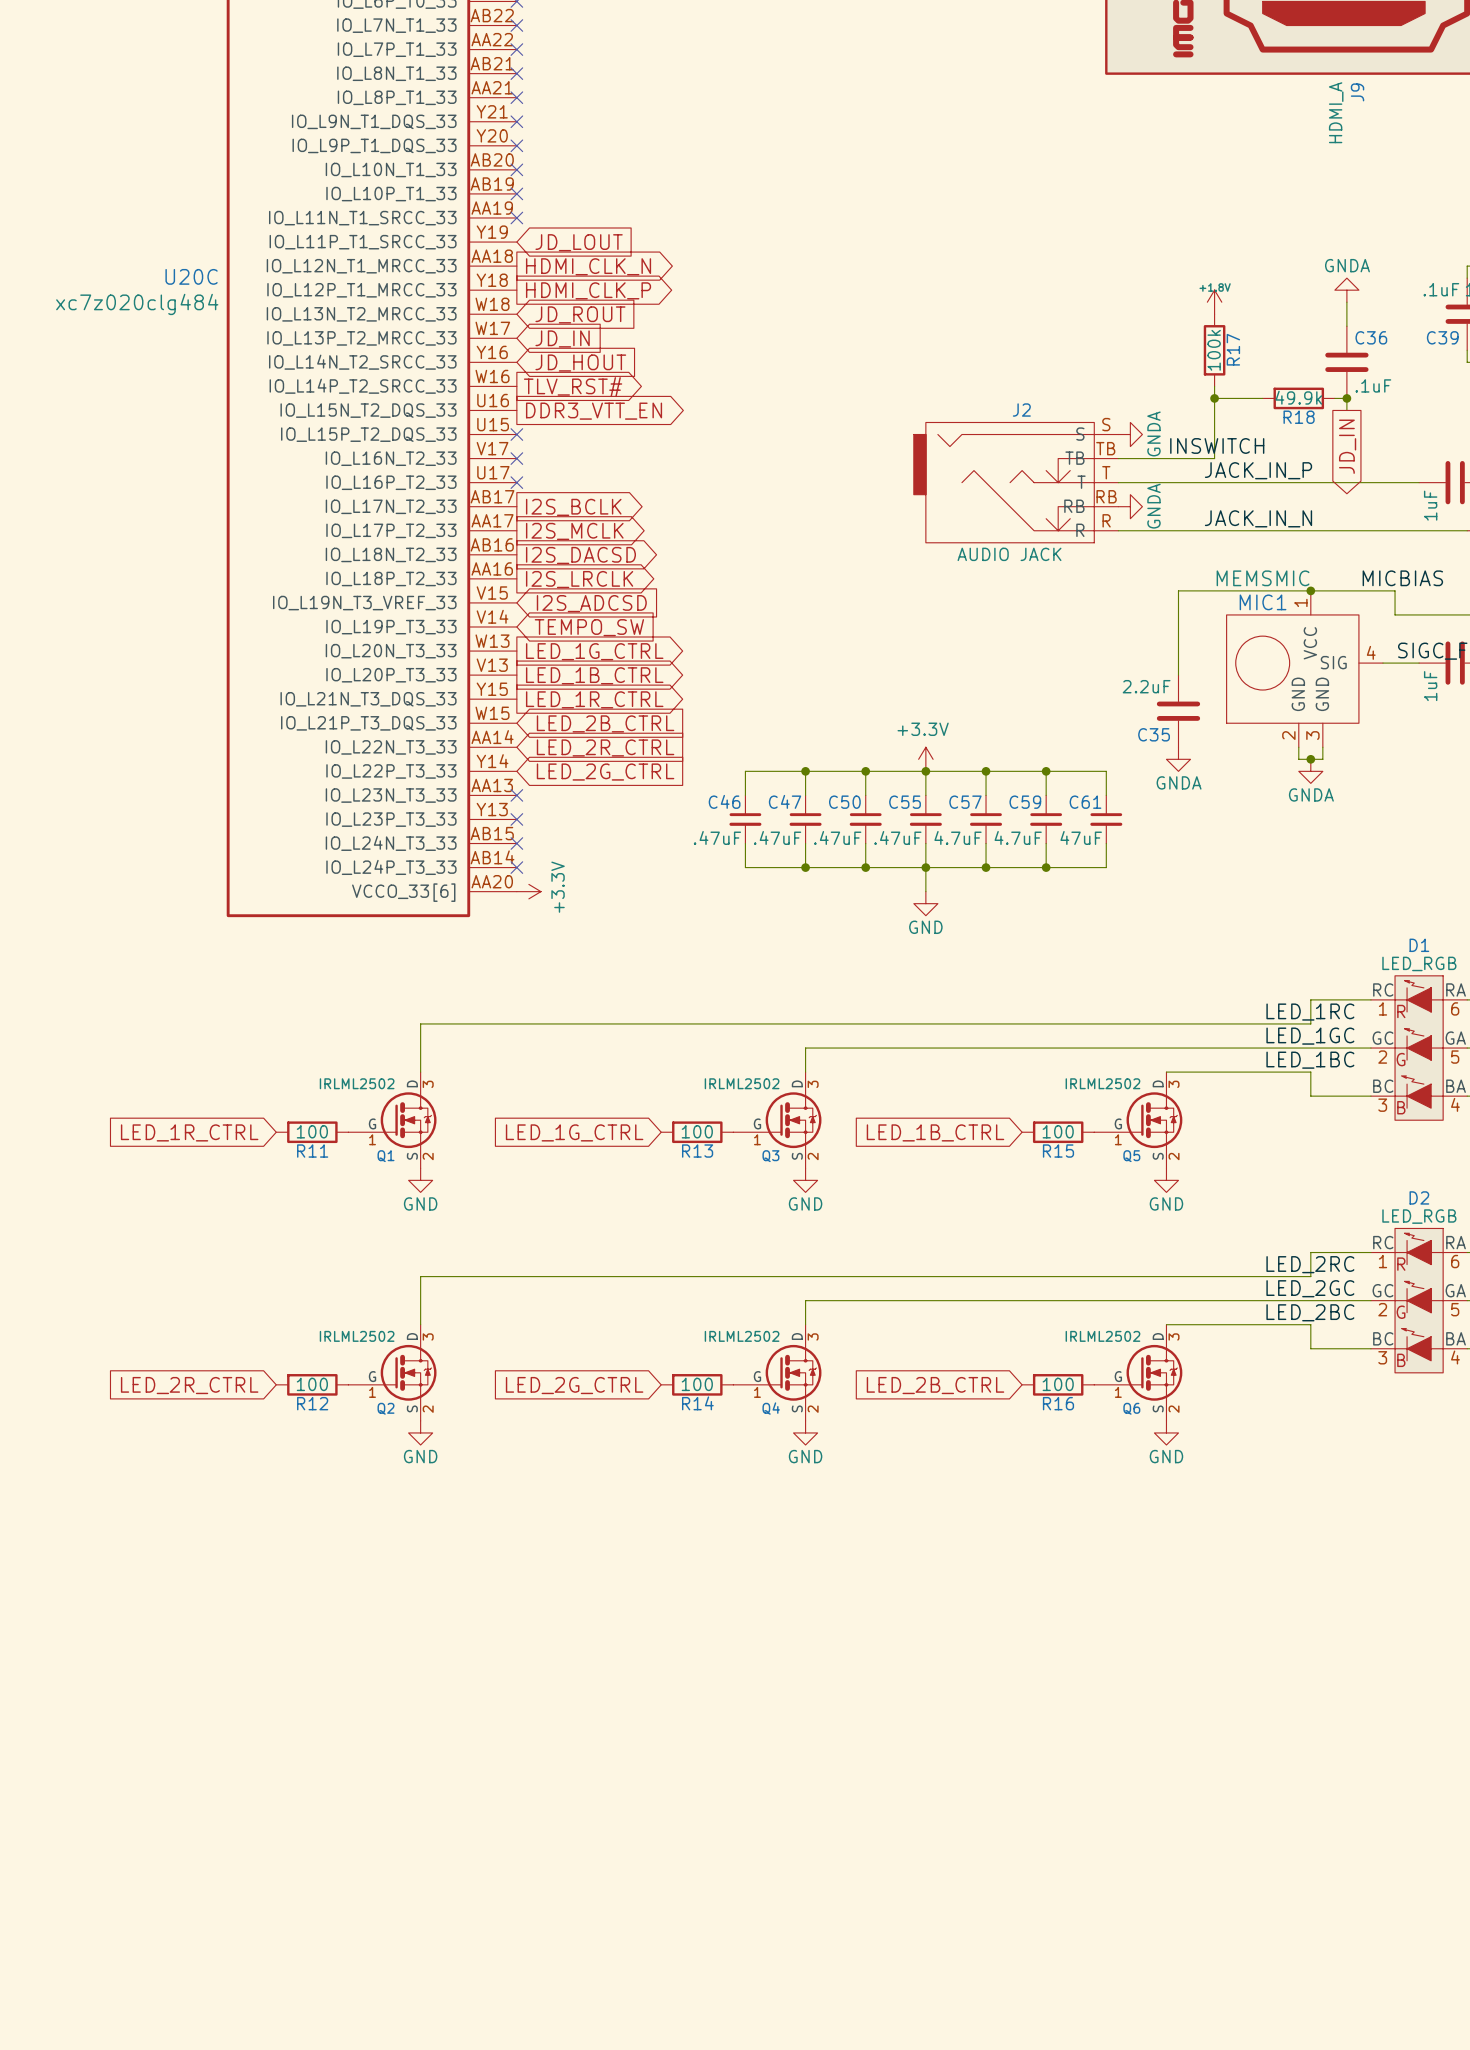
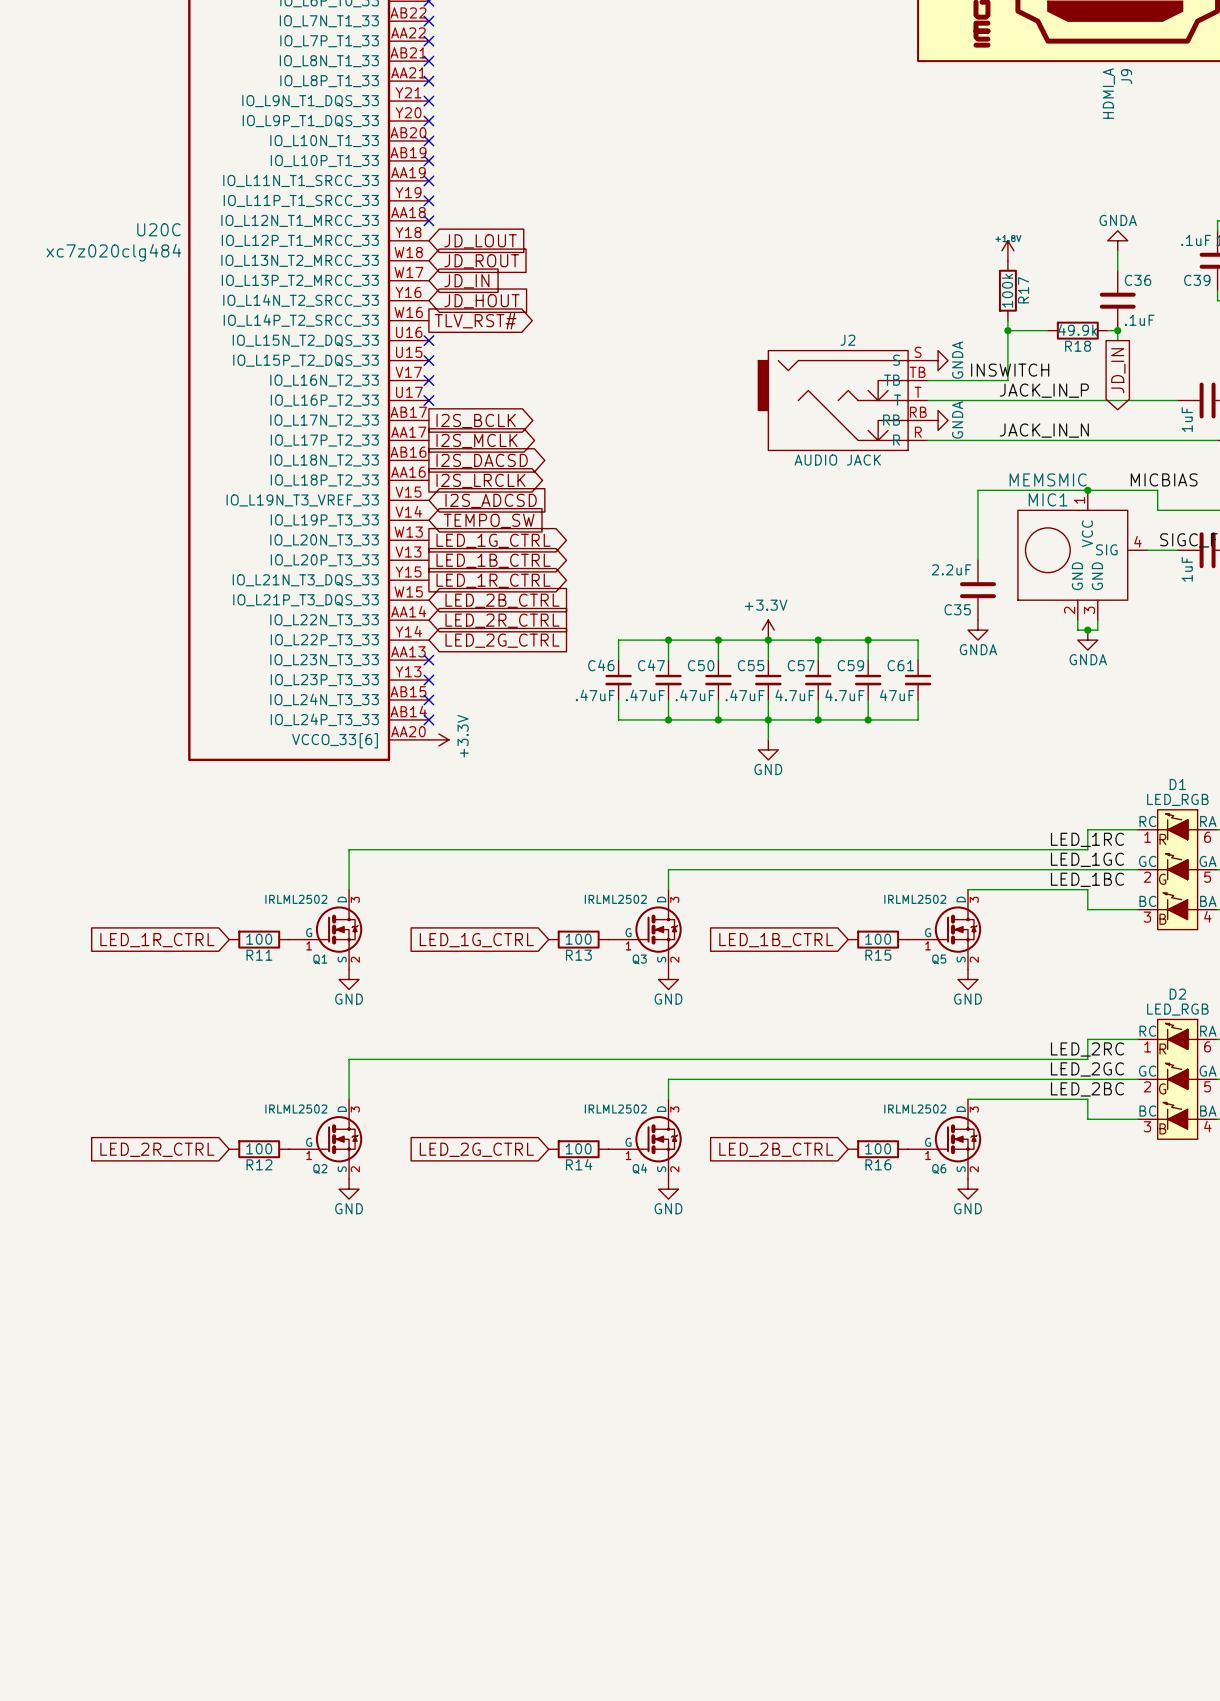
no-connect mark: none -> (428, 200)
global label: JD_LOUT (579, 242) -> none
no-connect mark: none -> (428, 220)
global label: HDMI_CLK_N (588, 266) -> none
global label shape: output (588, 290) -> input (480, 241)
global label: HDMI_CLK_P (588, 290) -> JD_LOUT (480, 241)
no-connect mark: none -> (428, 340)
global label: DDR3_VTT_EN (594, 411) -> none

